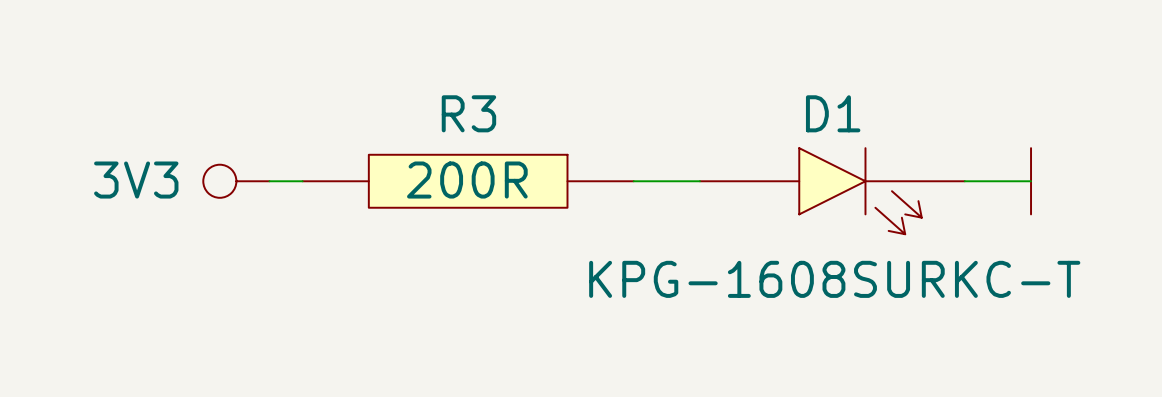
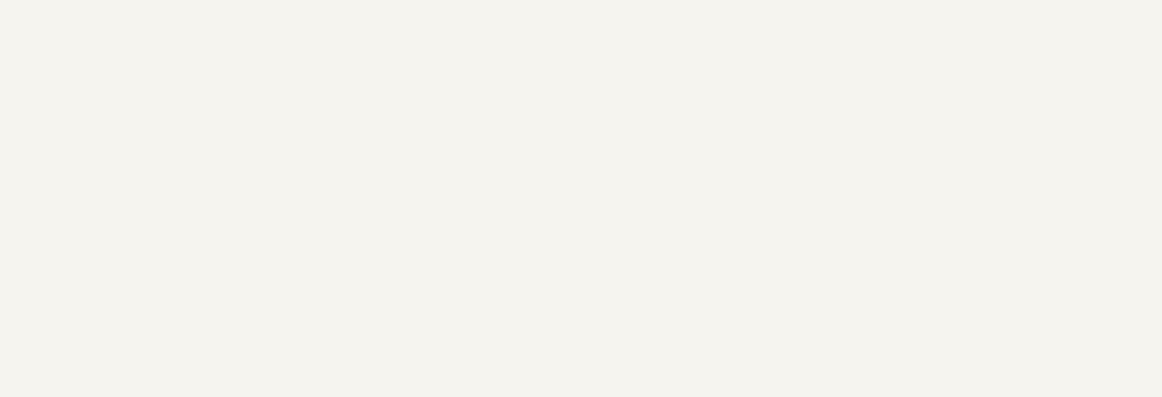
power symbol: 3V3 (236, 181) -> none
wire: (269, 181) (302, 181) -> none
R3: 200R (468, 181) -> none
wire: (633, 181) (699, 181) -> none
wire: (964, 181) (1031, 181) -> none
power symbol: (1031, 181) -> none
D1: KPG-1608SURKC-T (832, 191) -> none

